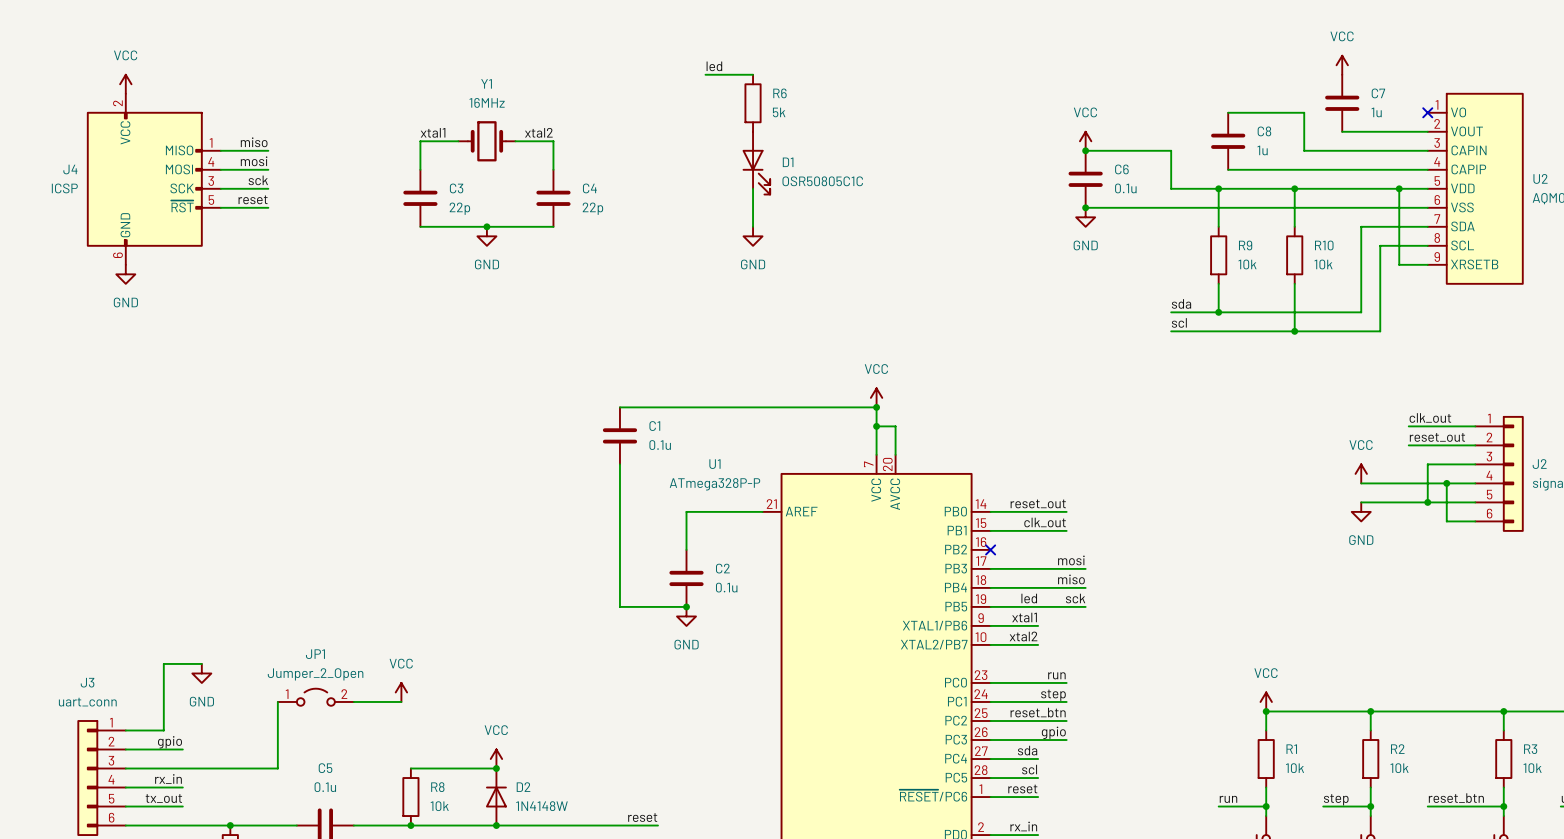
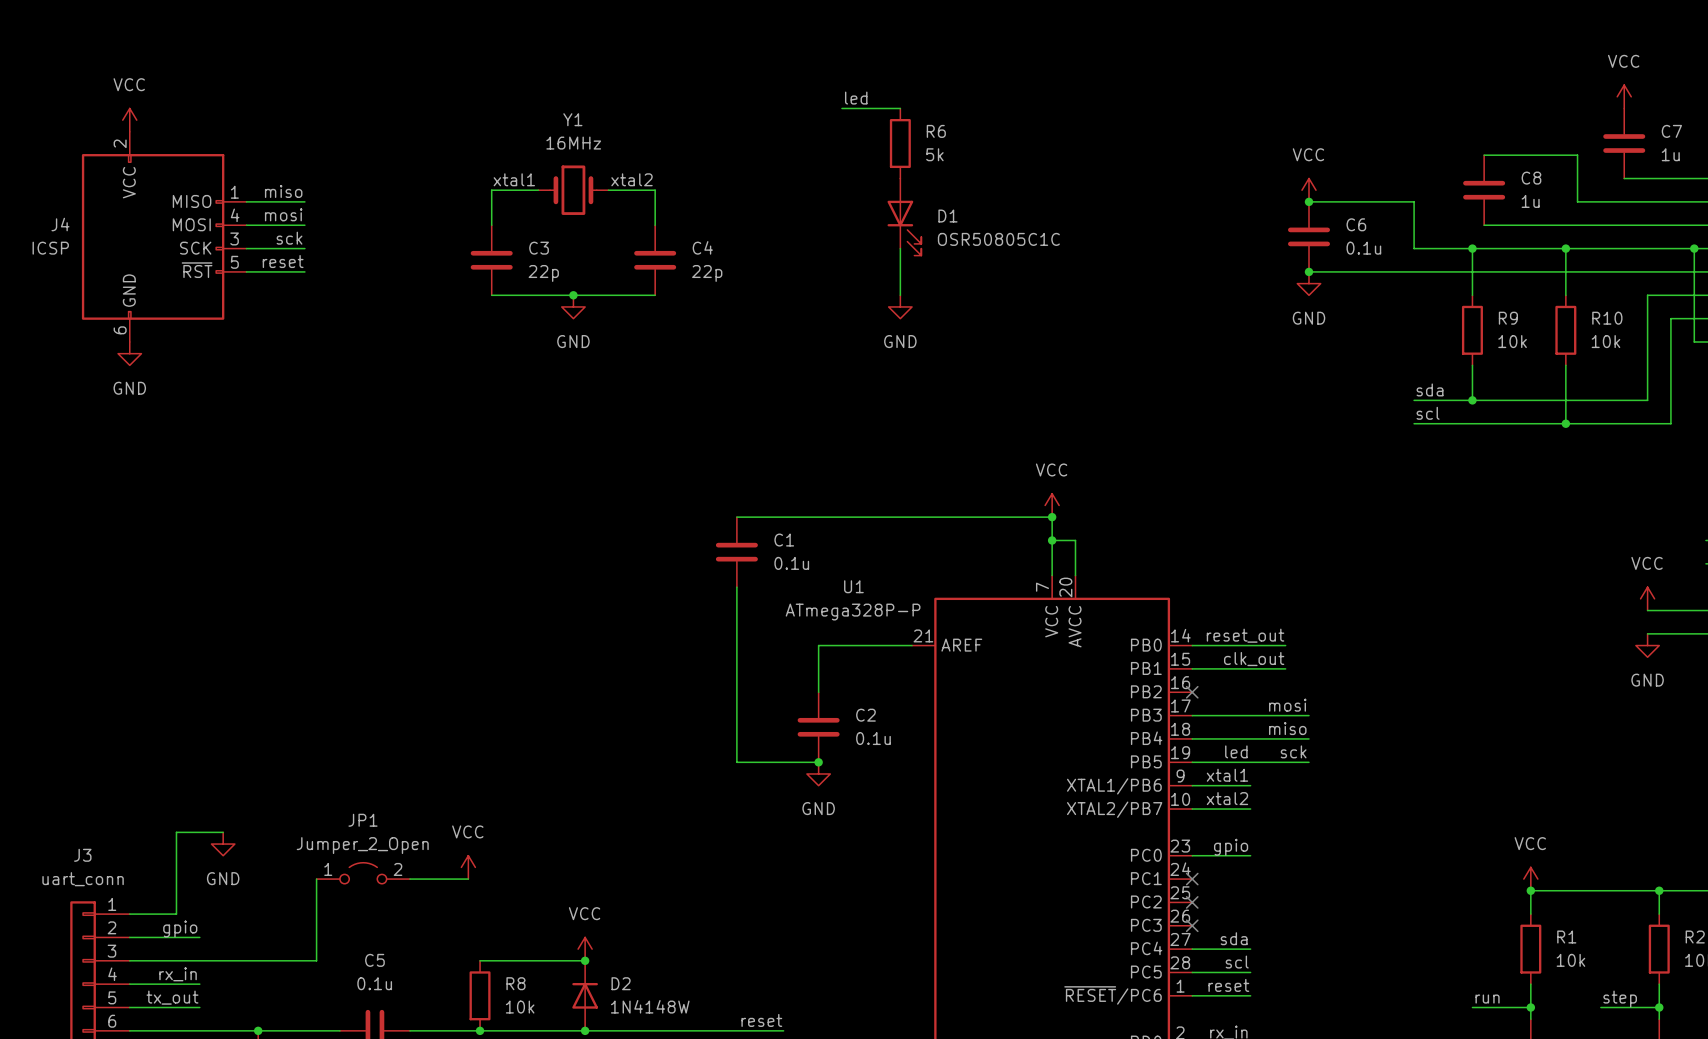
label: run (1056, 675) -> none
wire: (1038, 682) (1066, 682) -> none
label: step (1053, 695) -> none
wire: (990, 701) (1066, 701) -> none
no-connect mark: none -> (1192, 879)
label: reset_btn (1038, 712) -> none
wire: (990, 720) (1066, 720) -> none
no-connect mark: none -> (1192, 902)
label position: gpio (1053, 732) -> gpio (1231, 847)
wire: (990, 740) (1066, 740) -> none
no-connect mark: none -> (1192, 925)

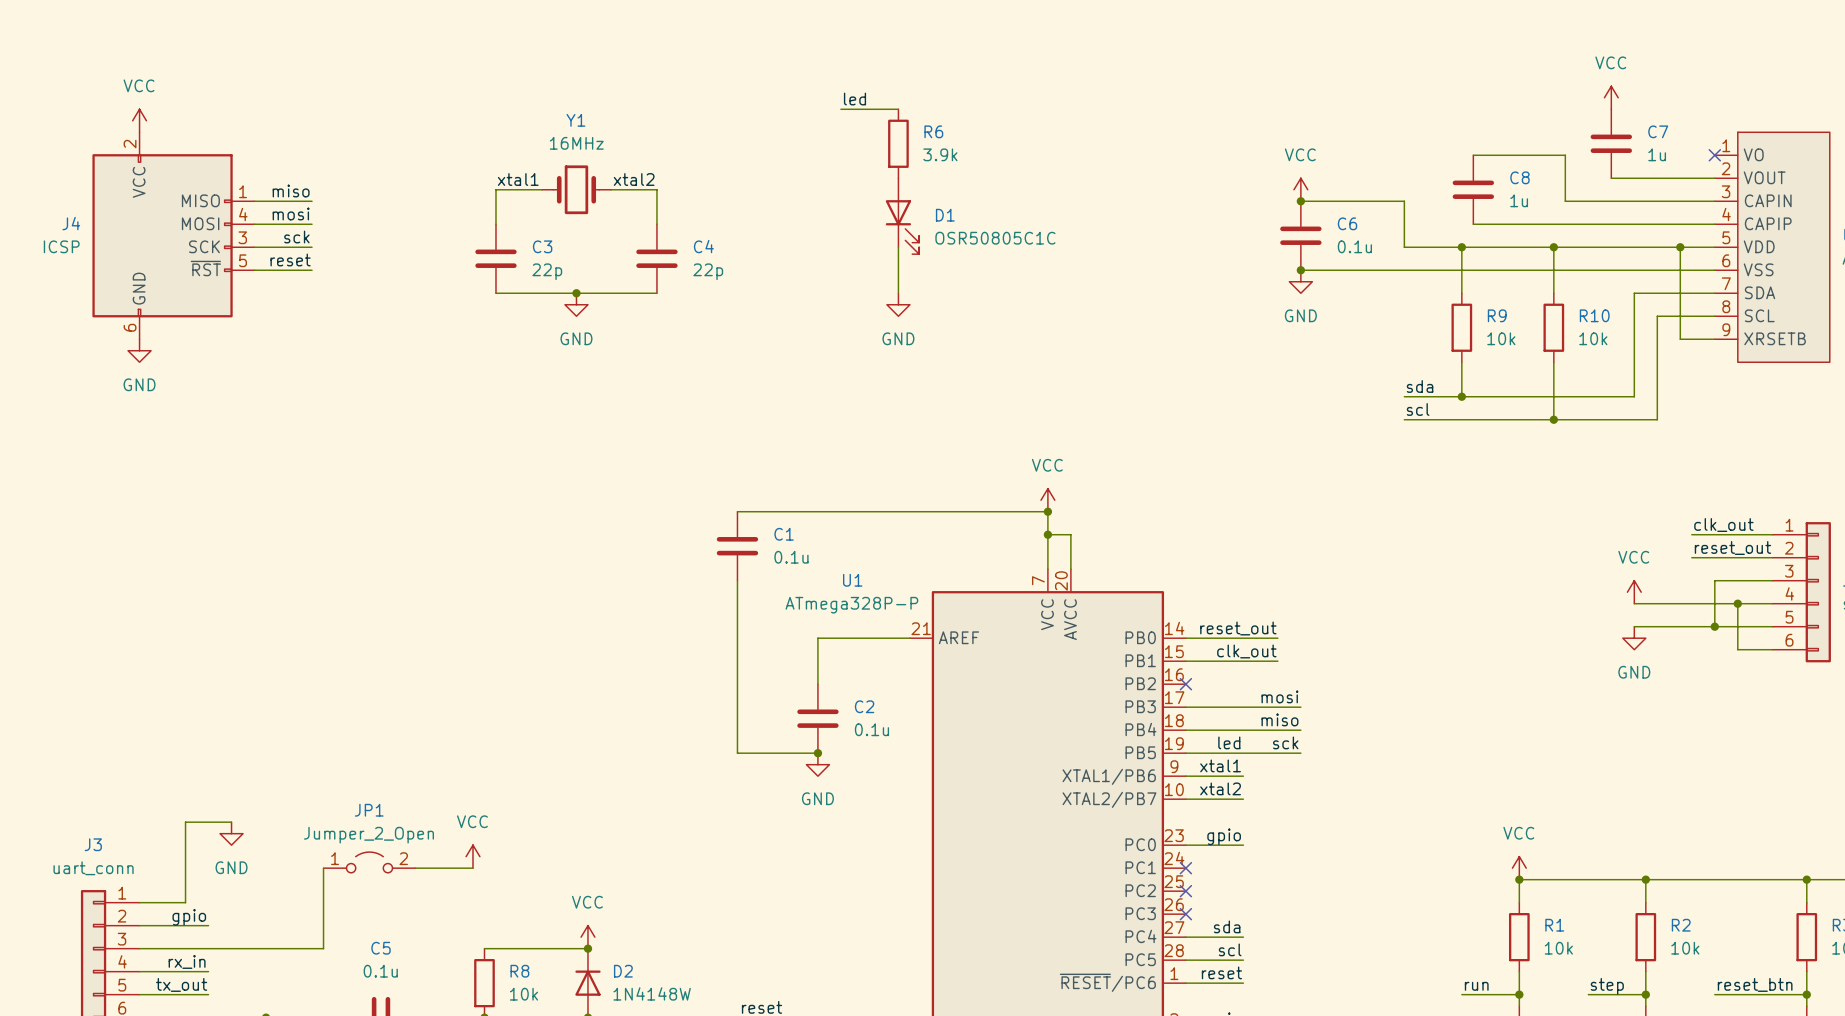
R6 value: 5k (934, 154) -> 3.9k (940, 154)

